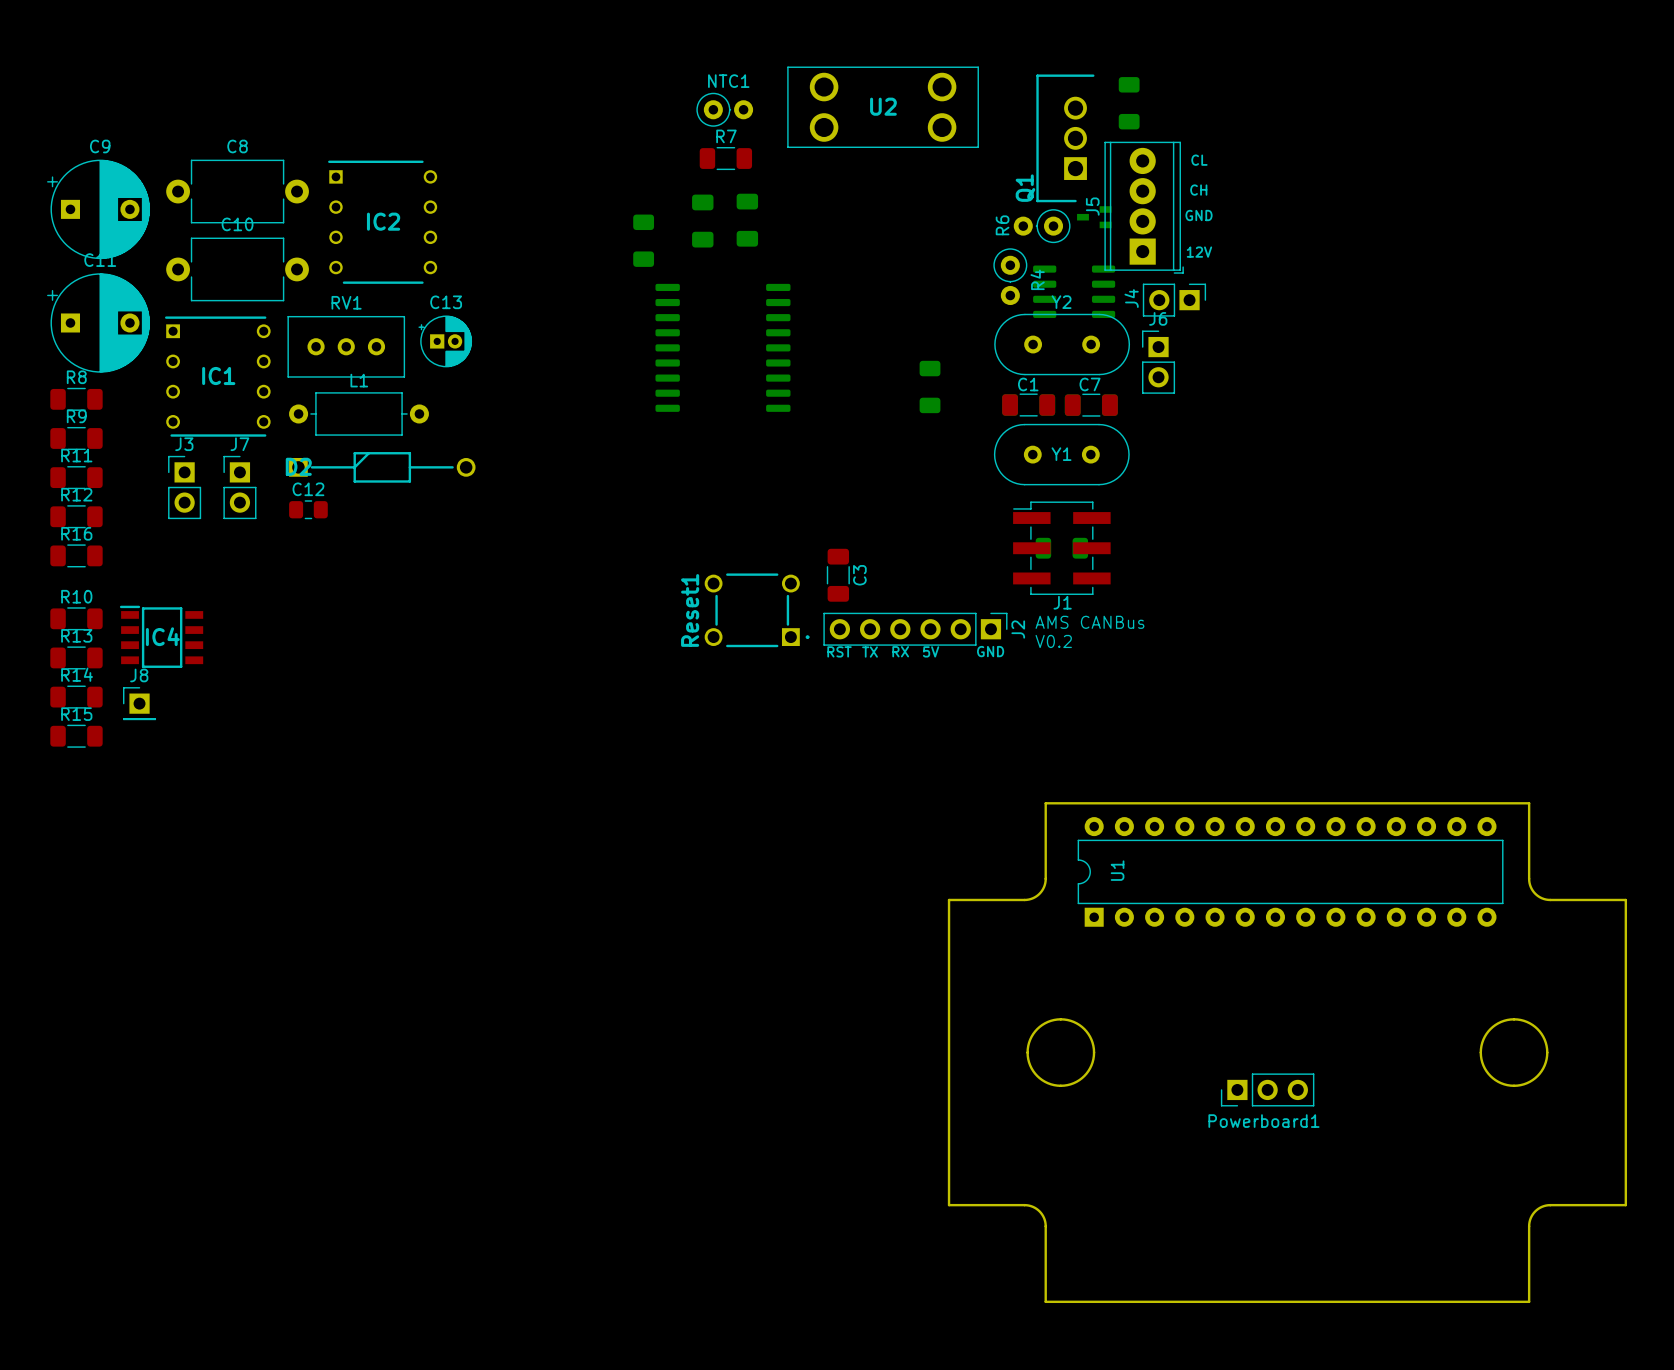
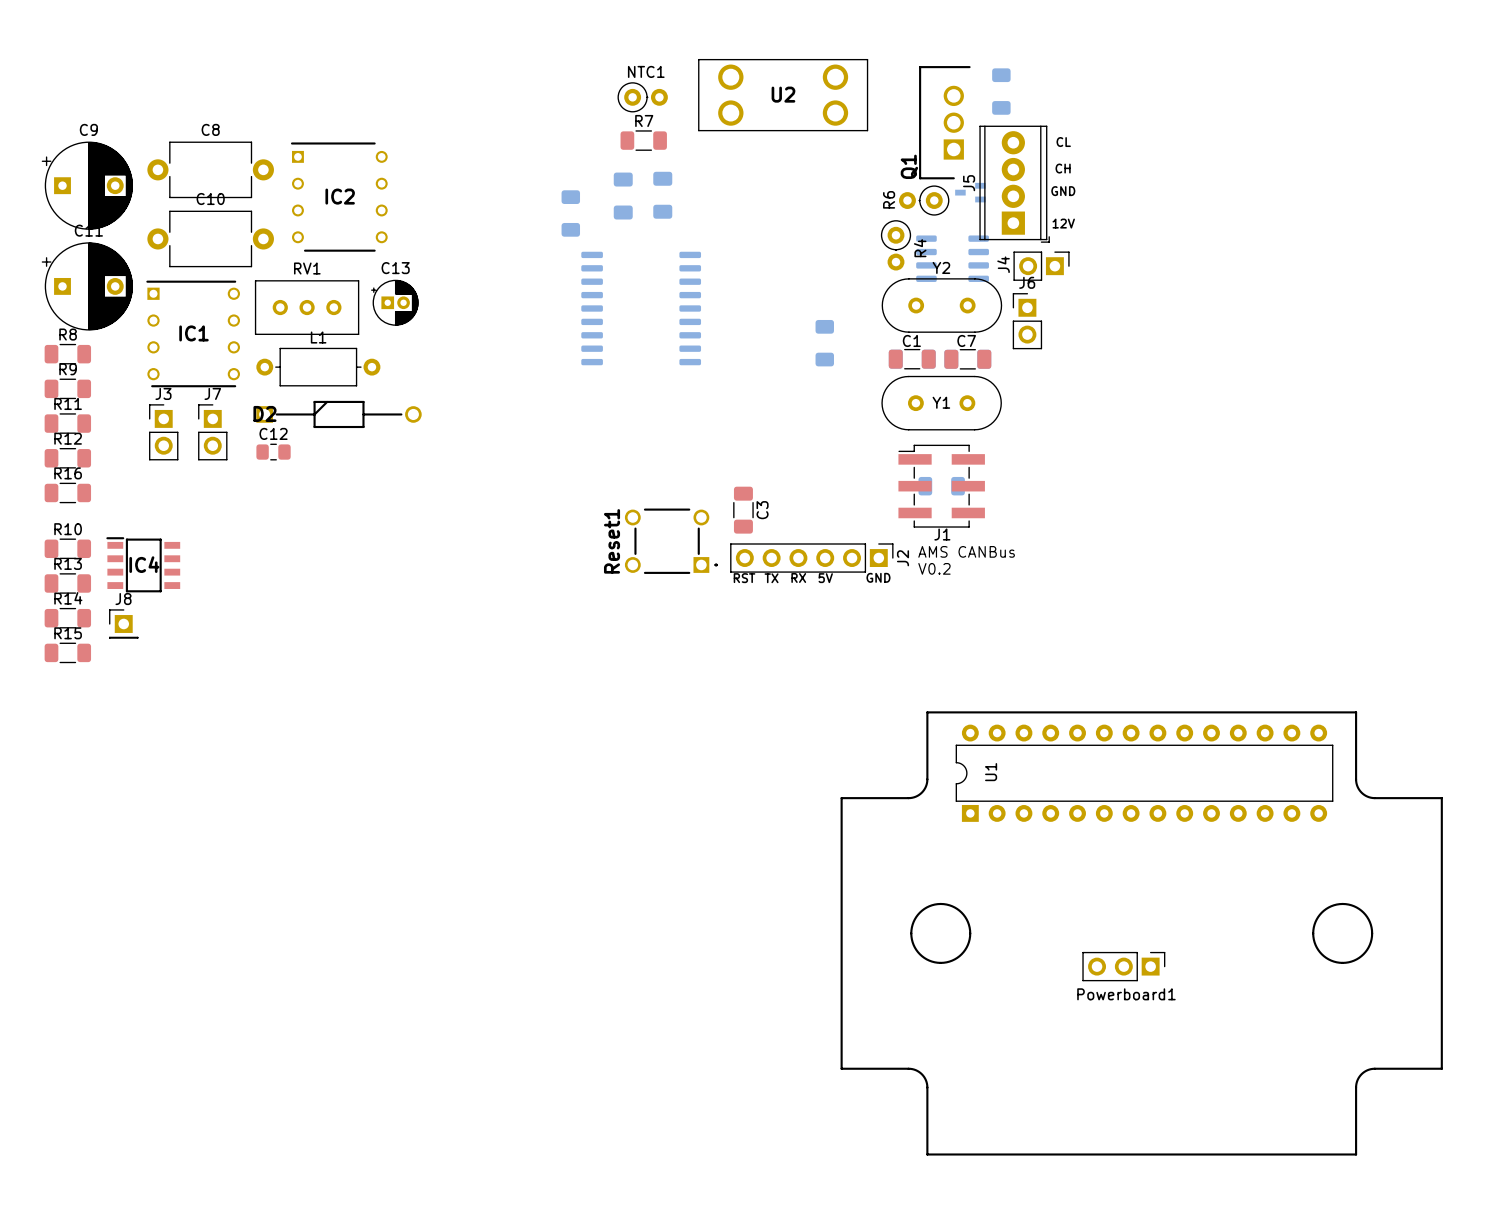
Powerboard1 rotation: 0° (1267, 1089) -> 180° (1123, 966)

